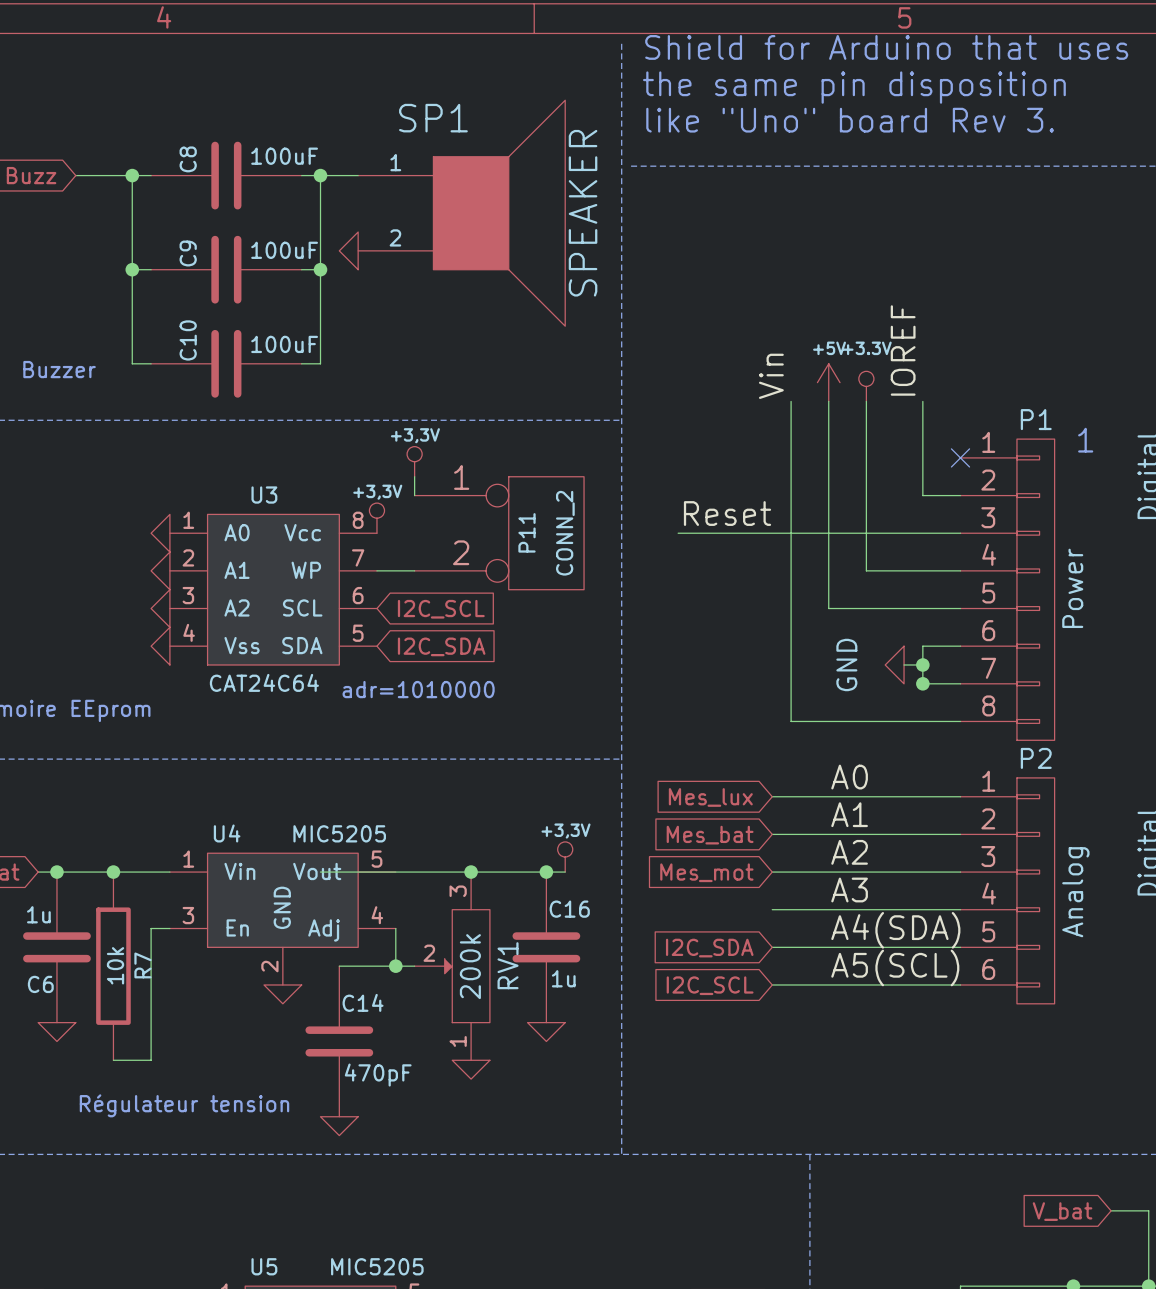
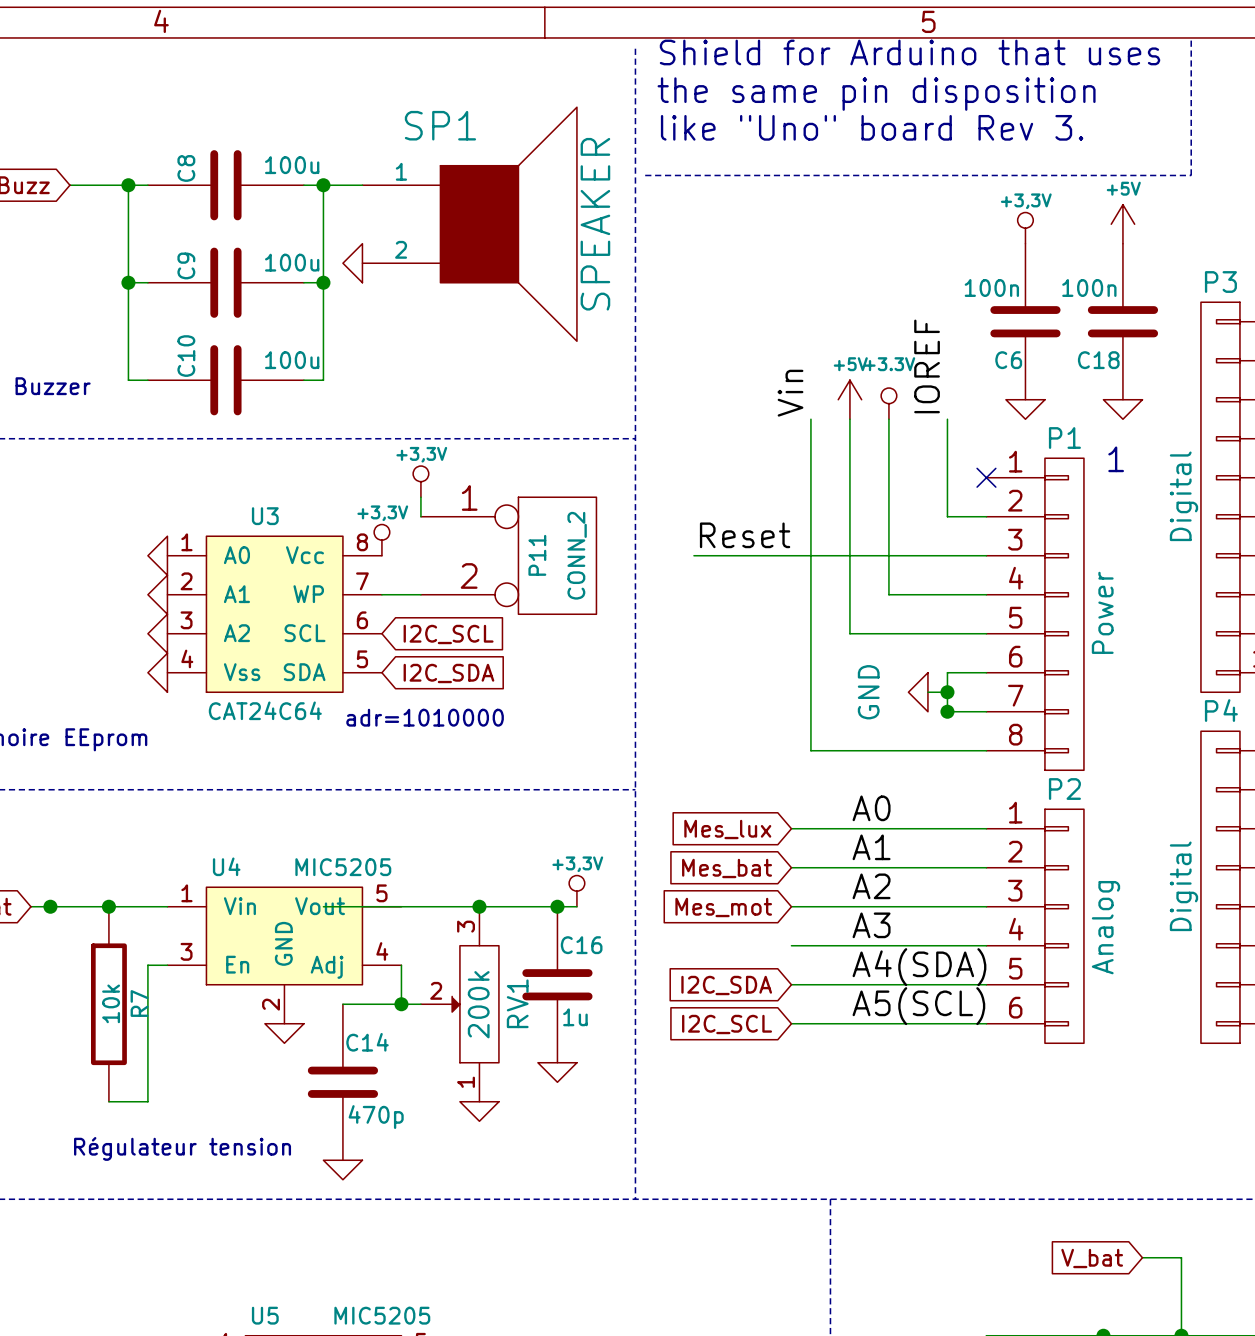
C8 value: 100uF (284, 156) -> 100u (292, 165)
power symbol: none -> +5V (1122, 224)
power symbol: none -> +3,3V (1025, 228)
C9 value: 100uF (284, 250) -> 100u (292, 262)
C18: none -> 100n (1122, 321)
C10 value: 100uF (284, 344) -> 100u (292, 360)
power symbol: none -> (1025, 409)
power symbol: none -> (1122, 409)
C6 value: 1u (38, 914) -> 100n (991, 288)
C6 position: (56, 947) -> (1025, 321)
power symbol: (56, 1032) -> none
C14 value: 470pF (378, 1075) -> 470p (376, 1117)

